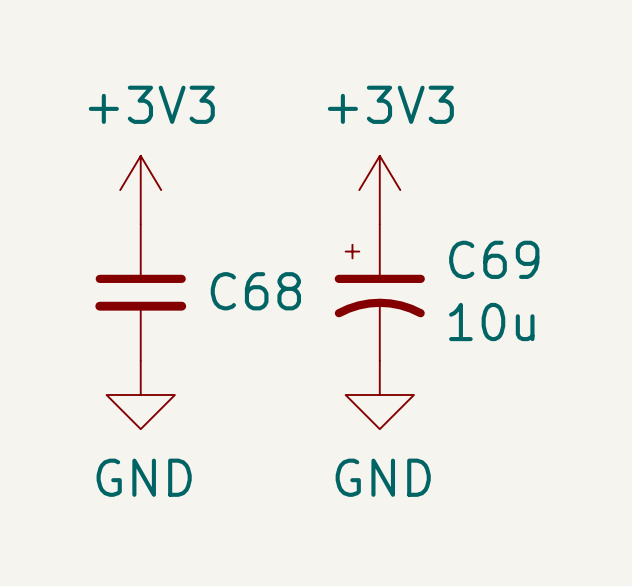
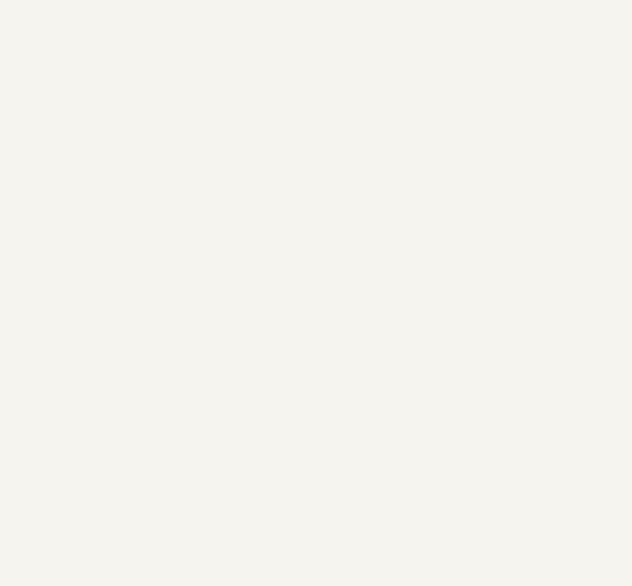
power symbol: +3V3 (140, 190) -> none
power symbol: +3V3 (379, 190) -> none
C68: (140, 292) -> none
C69: 10u (379, 292) -> none
power symbol: GND (140, 394) -> none
power symbol: GND (379, 394) -> none

